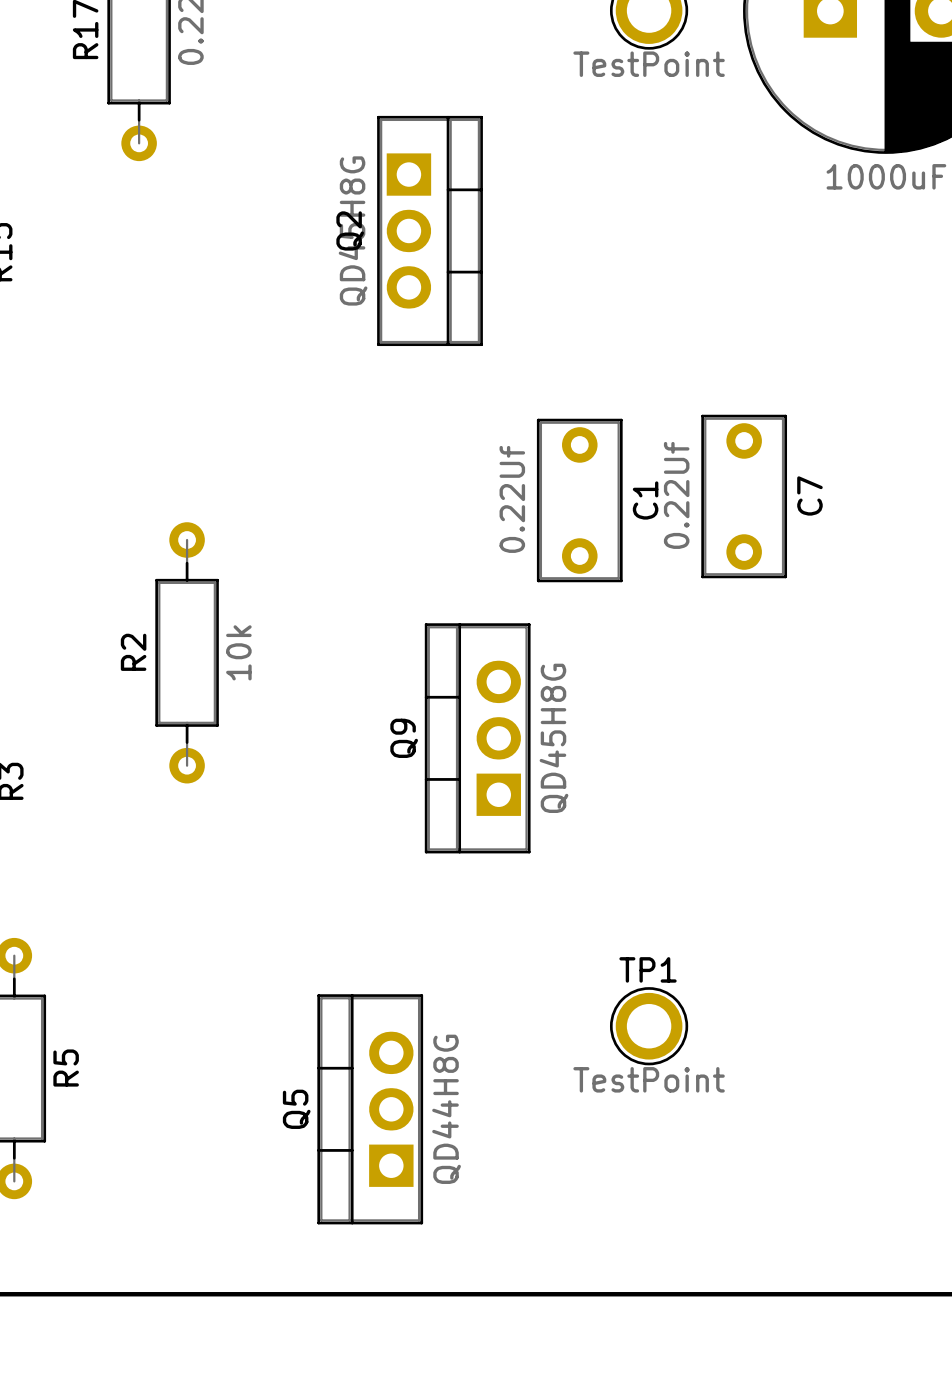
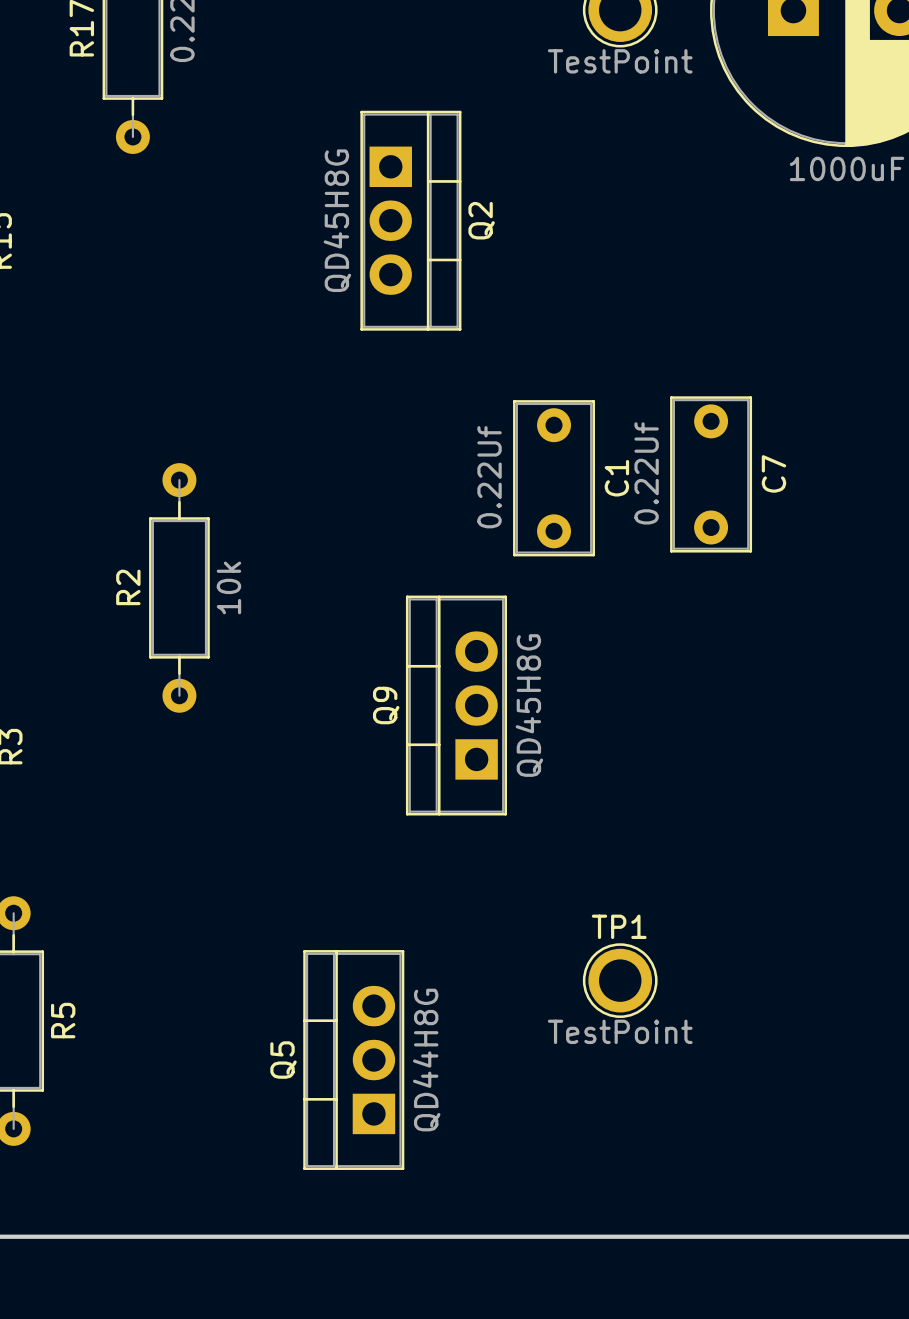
Q2 name position: Q2 (350, 230) -> Q2 (481, 220)
R2 position: (187, 652) -> (179, 587)

